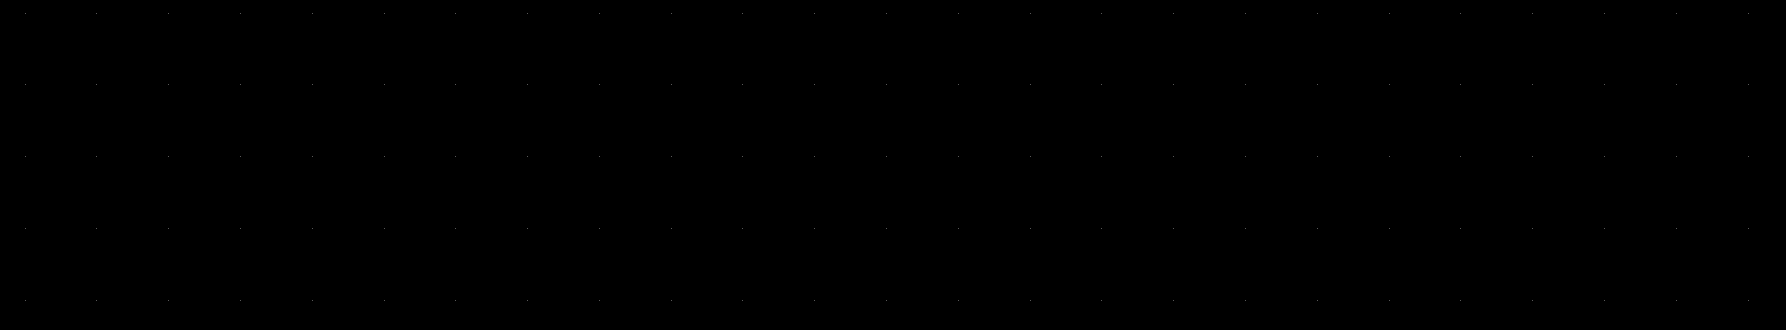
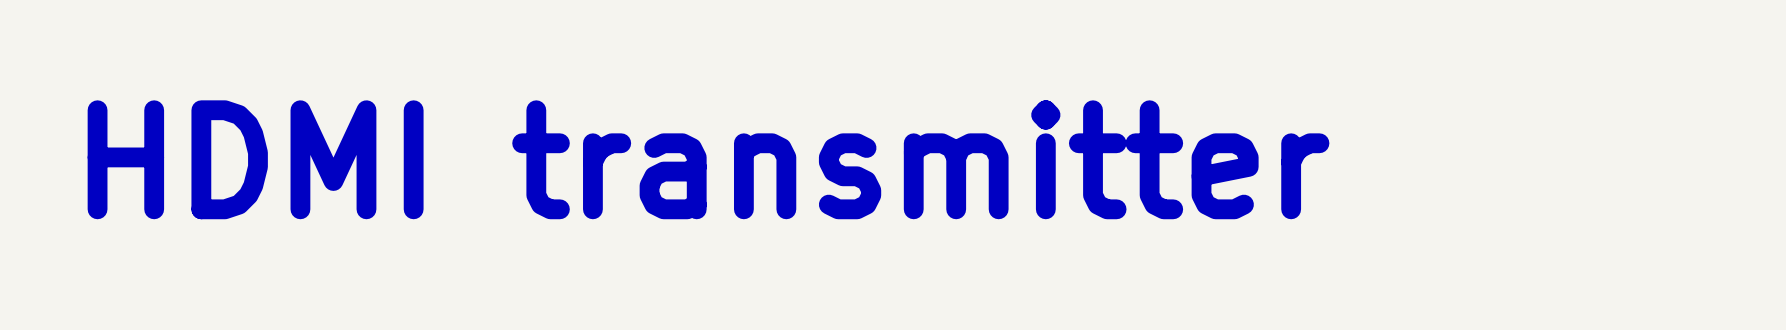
text: none -> HDMI transmitter (708, 159)

